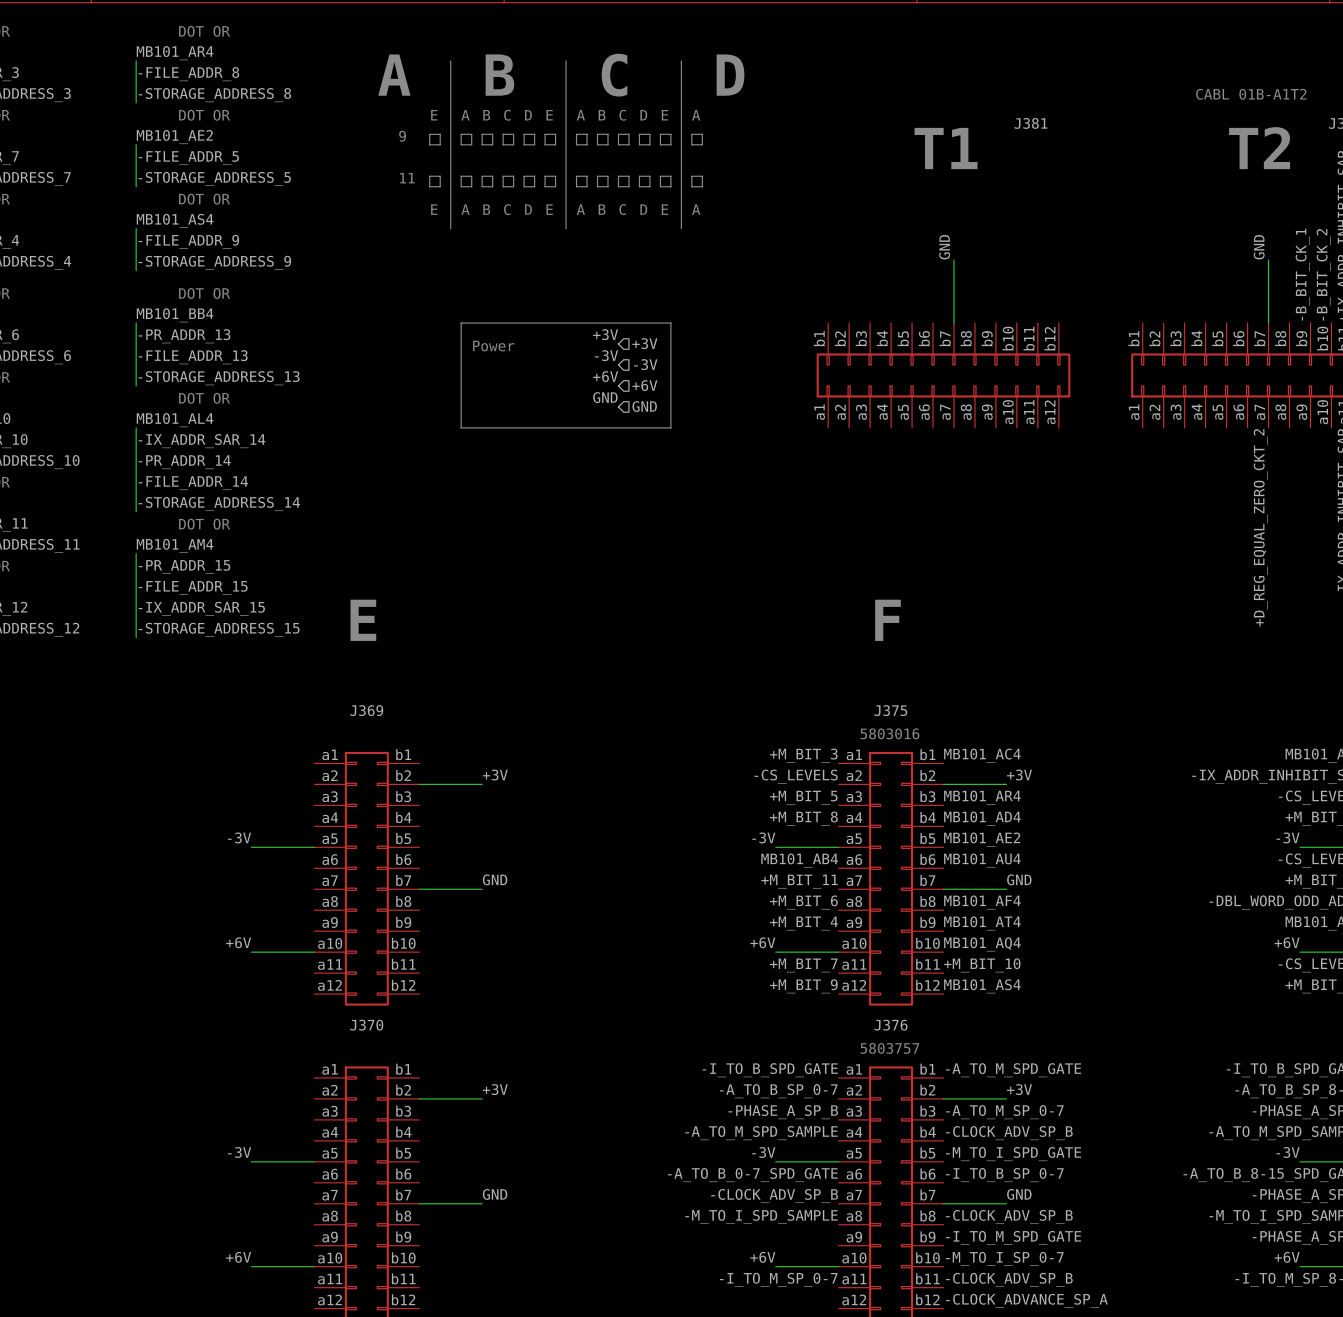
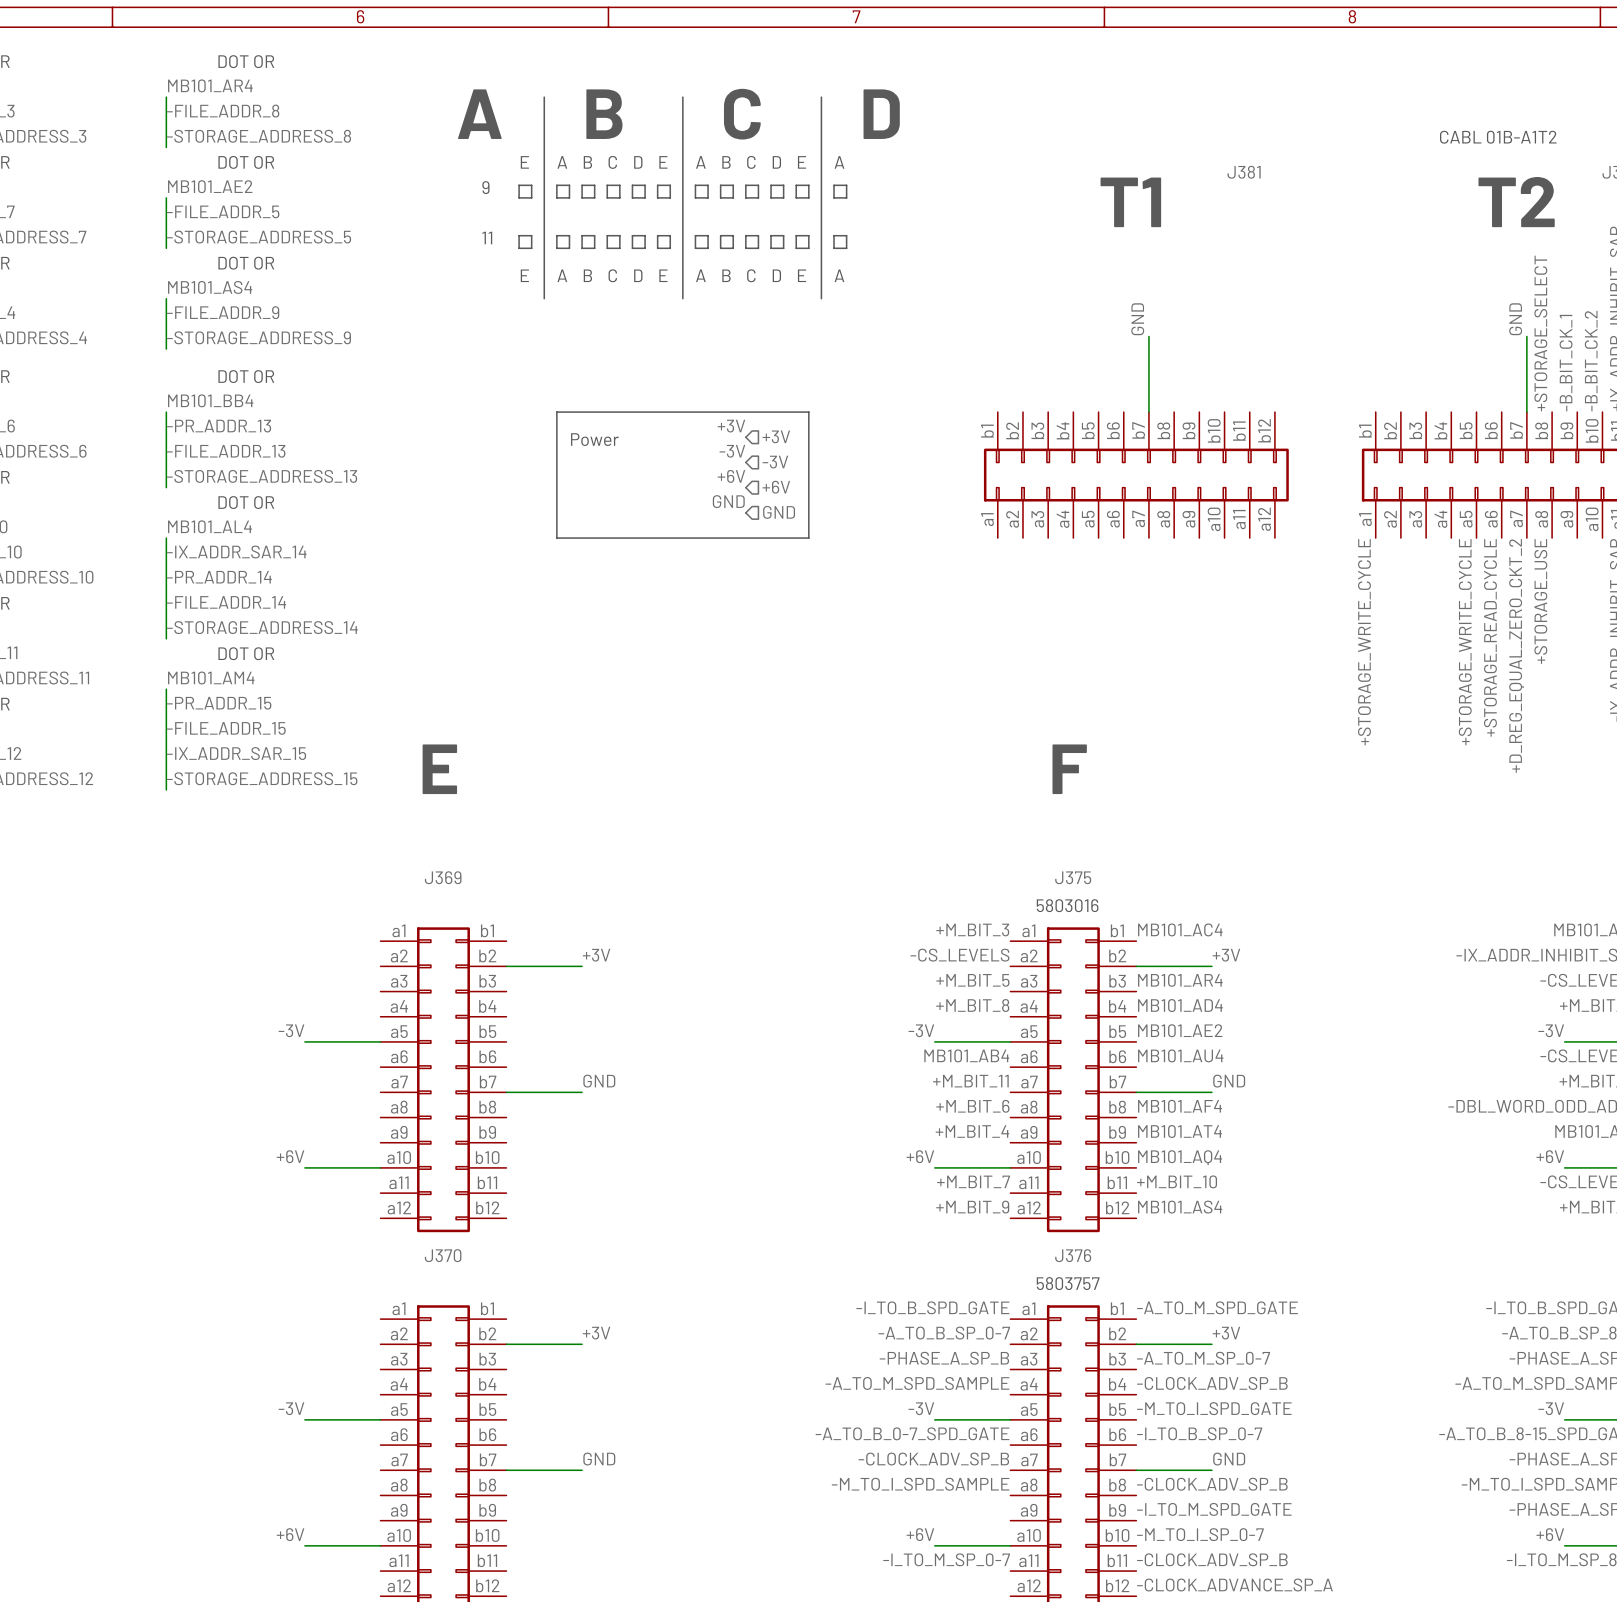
label: none -> +STORAGE_SELECT (1540, 333)
label: none -> +STORAGE_USE (1540, 601)
label: none -> +STORAGE_READ_CYCLE (1490, 637)
label: none -> +STORAGE_WRITE_CYCLE (1364, 642)
label: none -> +STORAGE_WRITE_CYCLE (1465, 642)

